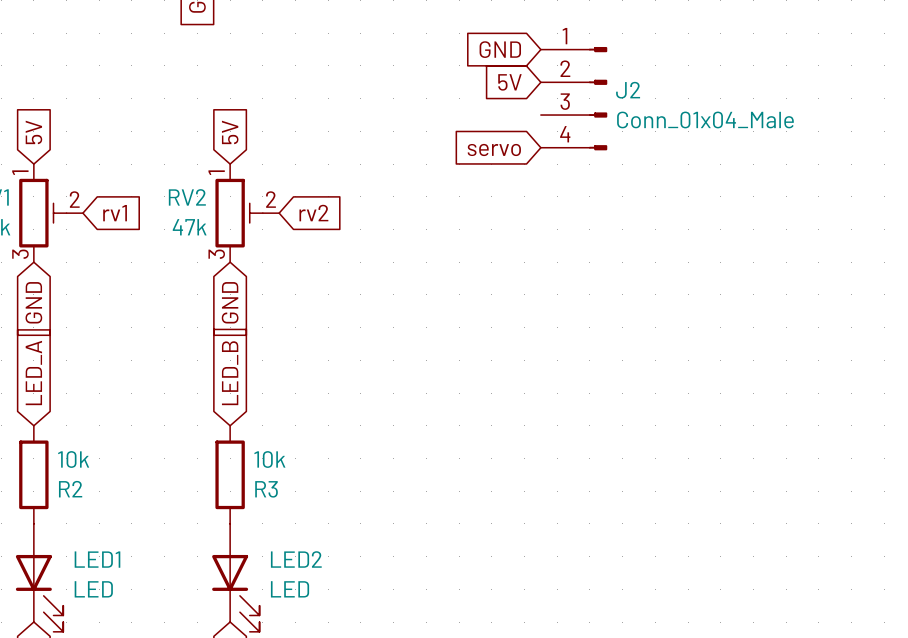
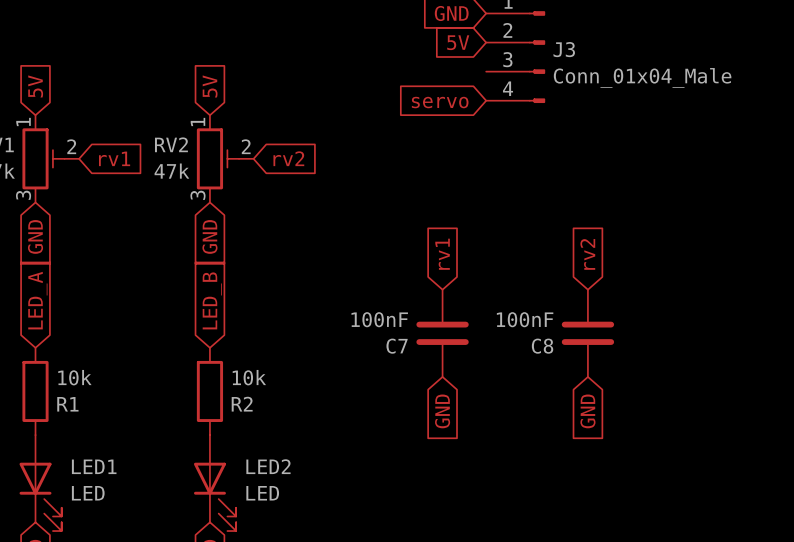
J2 name: J2 (628, 90) -> J3 (564, 49)
global label: none -> rv2 (587, 254)
global label: none -> rv1 (442, 254)
C7: none -> 100nF (442, 333)
C8: none -> 100nF (587, 333)
R2 name: R2 (70, 489) -> R1 (67, 404)
R3 name: R3 (266, 489) -> R2 (242, 404)
global label: none -> GND (442, 411)
global label: none -> GND (587, 411)

